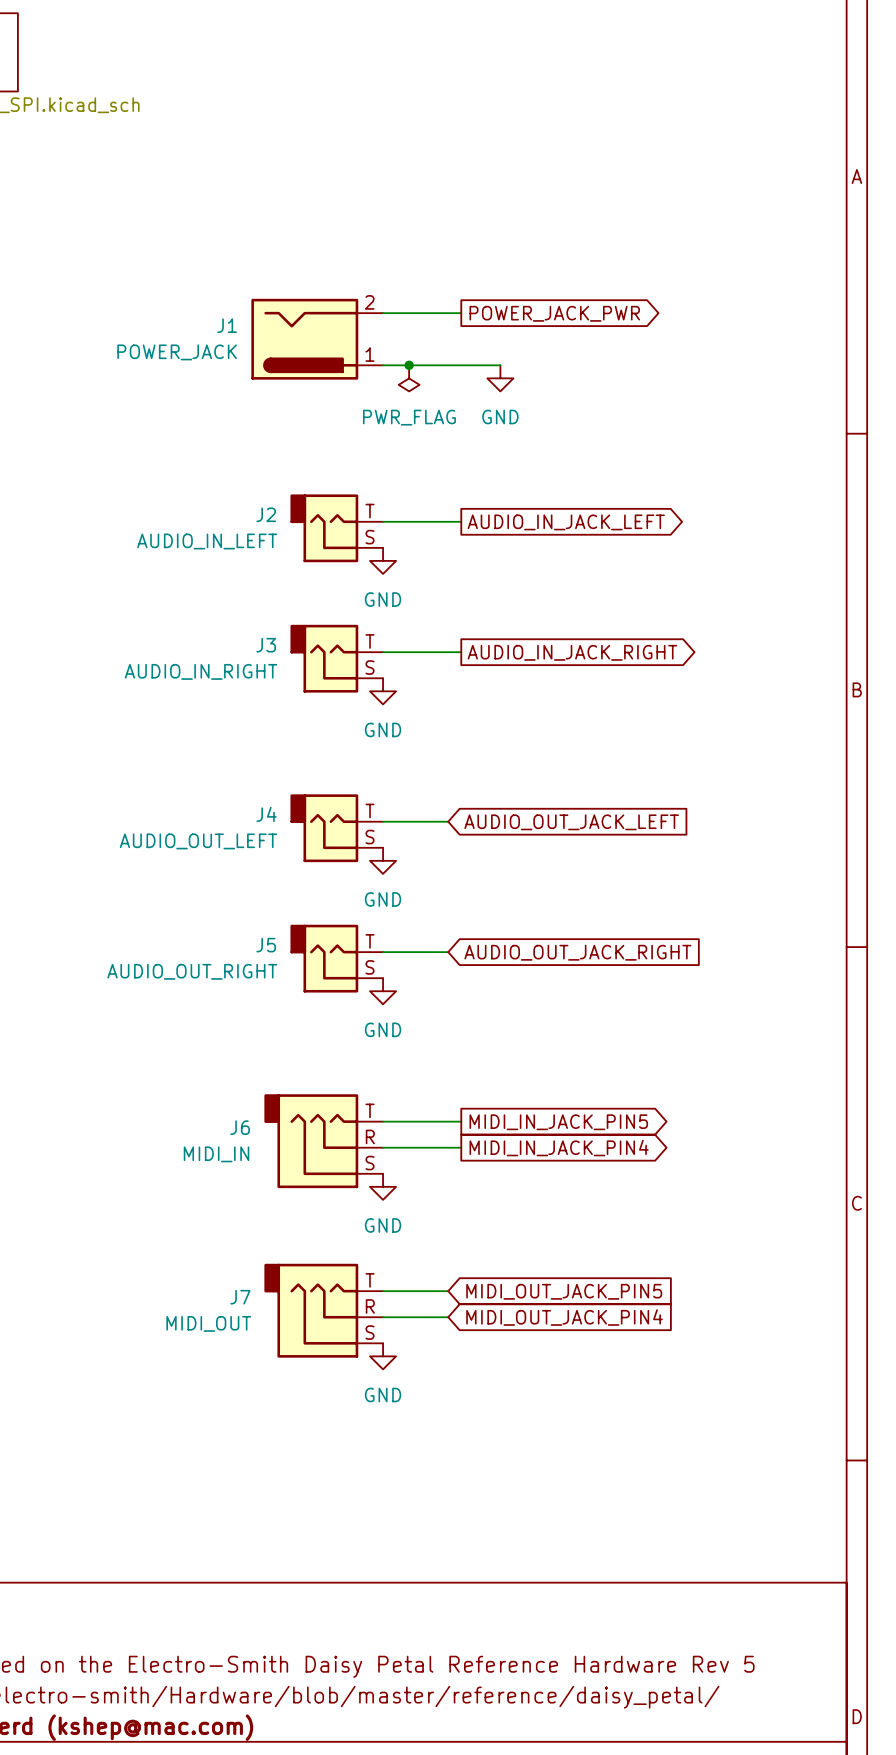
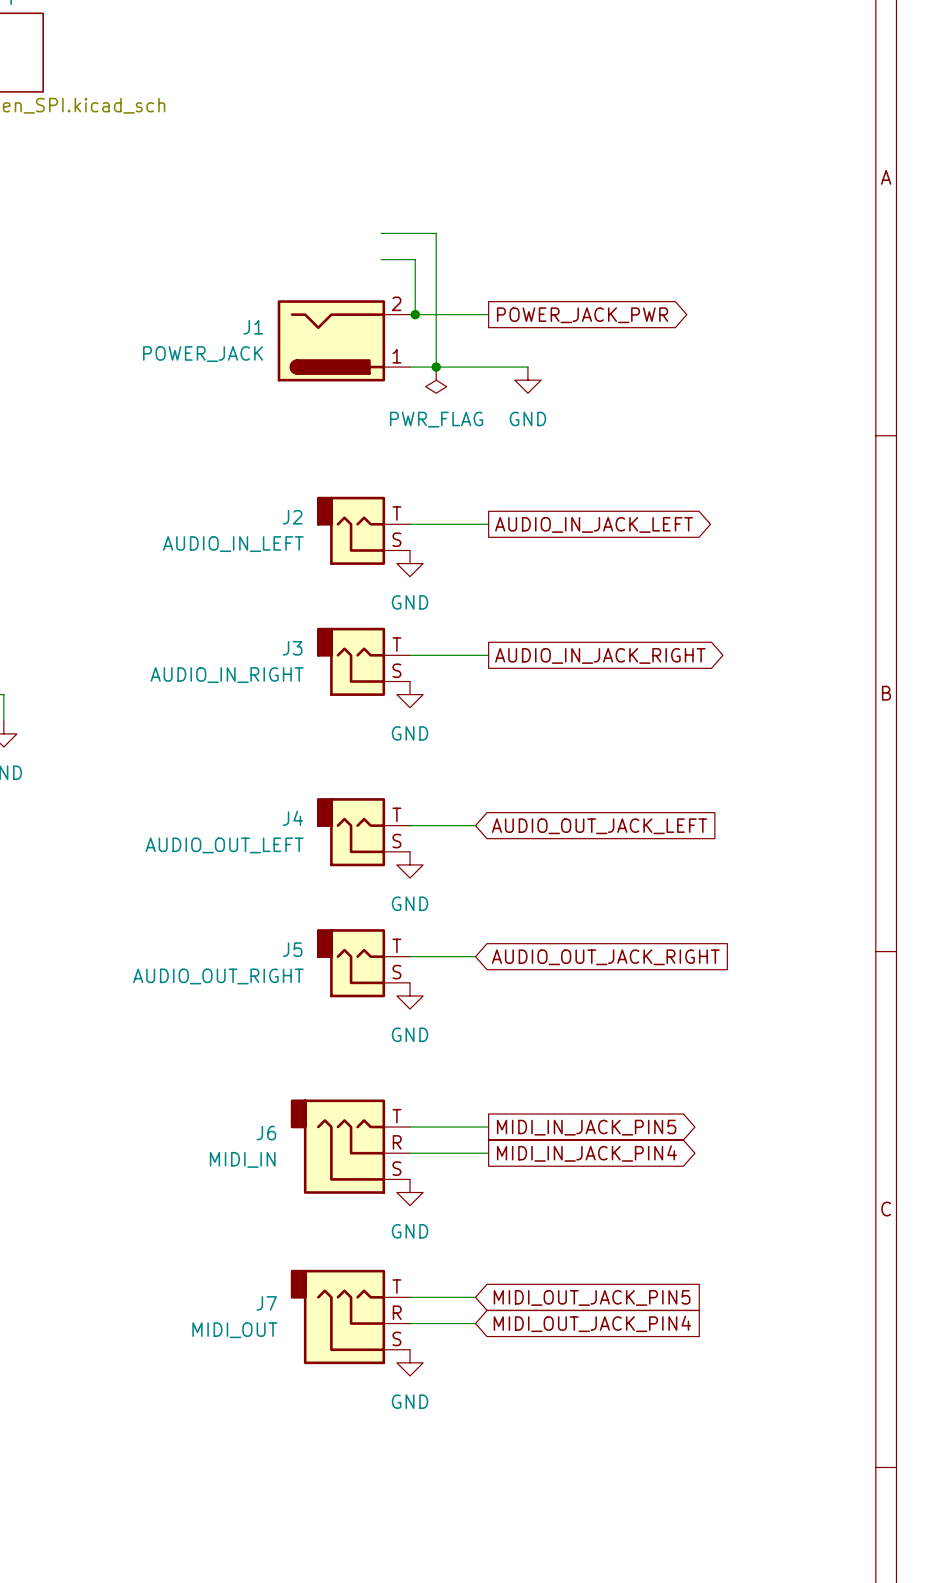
wire: none -> (381, 233) (436, 233) (436, 367)
wire: none -> (381, 259) (415, 259) (415, 314)
junction: none -> (415, 314)

